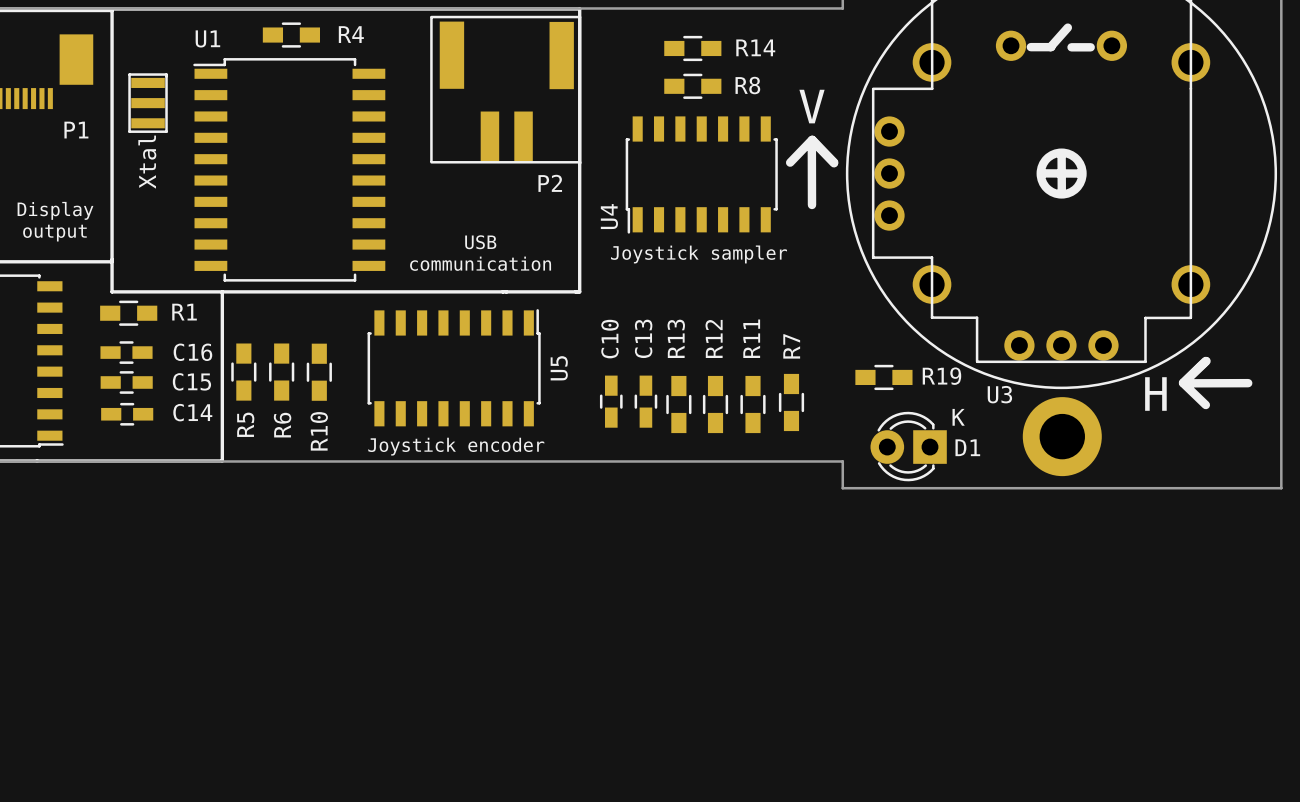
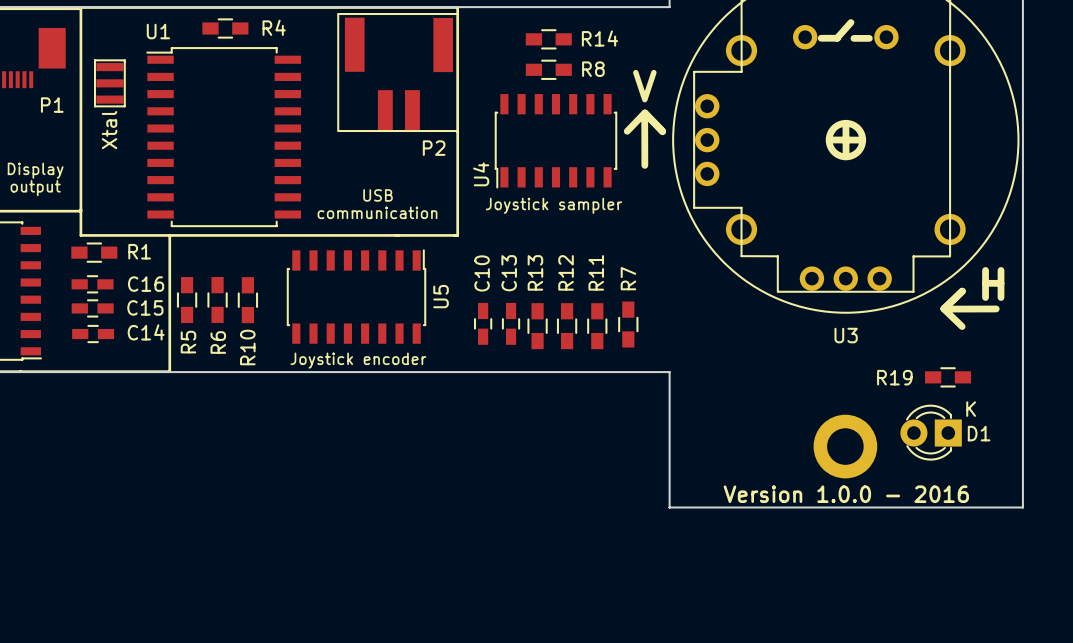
R19 name position: R19 (941, 376) -> R19 (894, 377)
R19 position: (883, 377) -> (948, 377)
U3 name position: U3 (999, 394) -> U3 (846, 335)
U3 text position: H (1155, 394) -> H (993, 283)
part position: (1062, 436) -> (845, 446)
D1 position: (908, 446) -> (931, 432)
board edge: (842, 488) (1281, 488) -> (669, 393) (669, 507) (1022, 507) (1022, 393)
text: none -> Version 1.0.0 - 2016 (846, 494)

